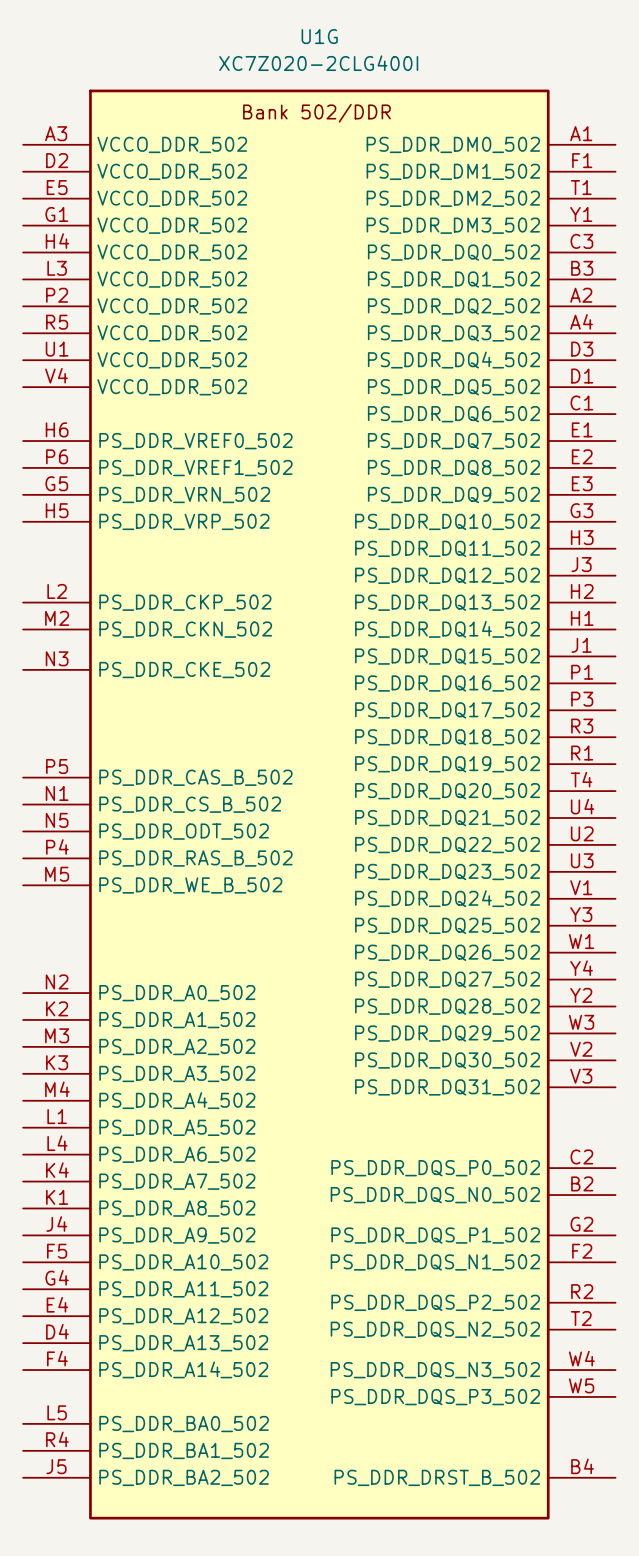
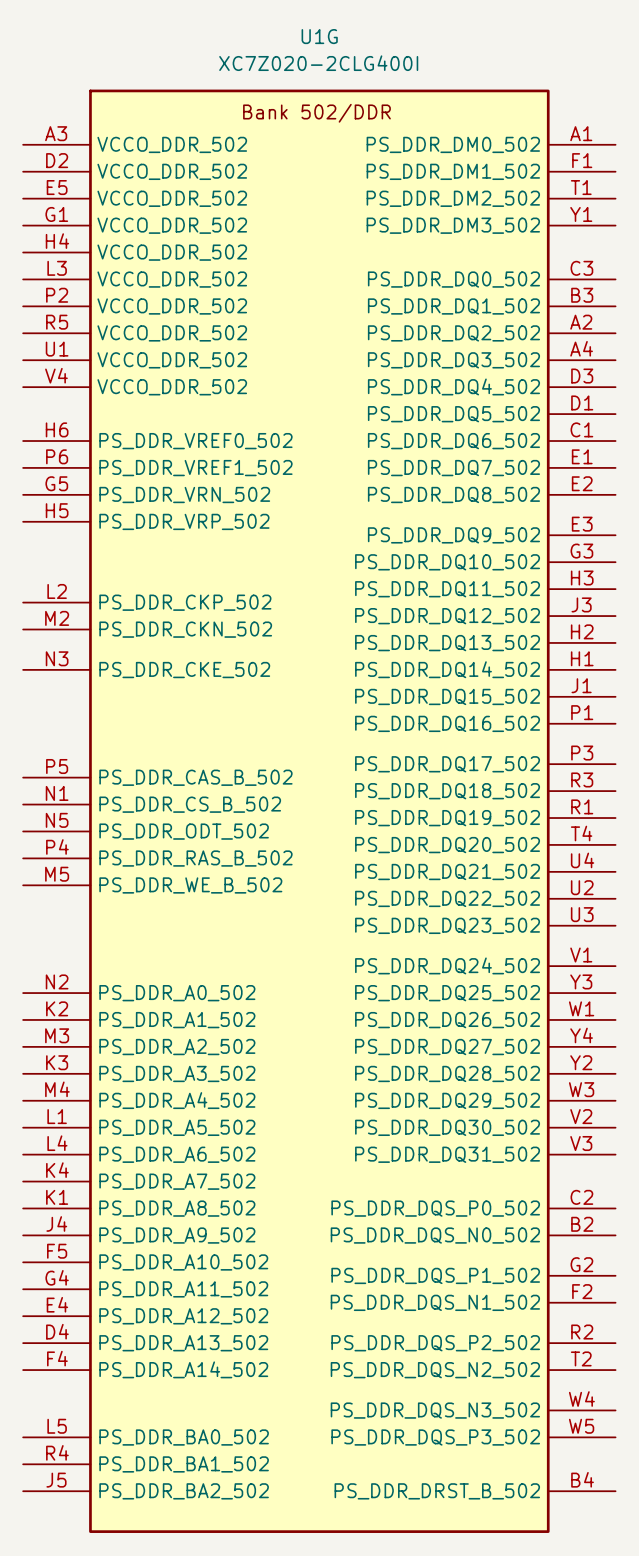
U1G symbol: [23, 89, 616, 1520] -> [23, 89, 616, 1533]

